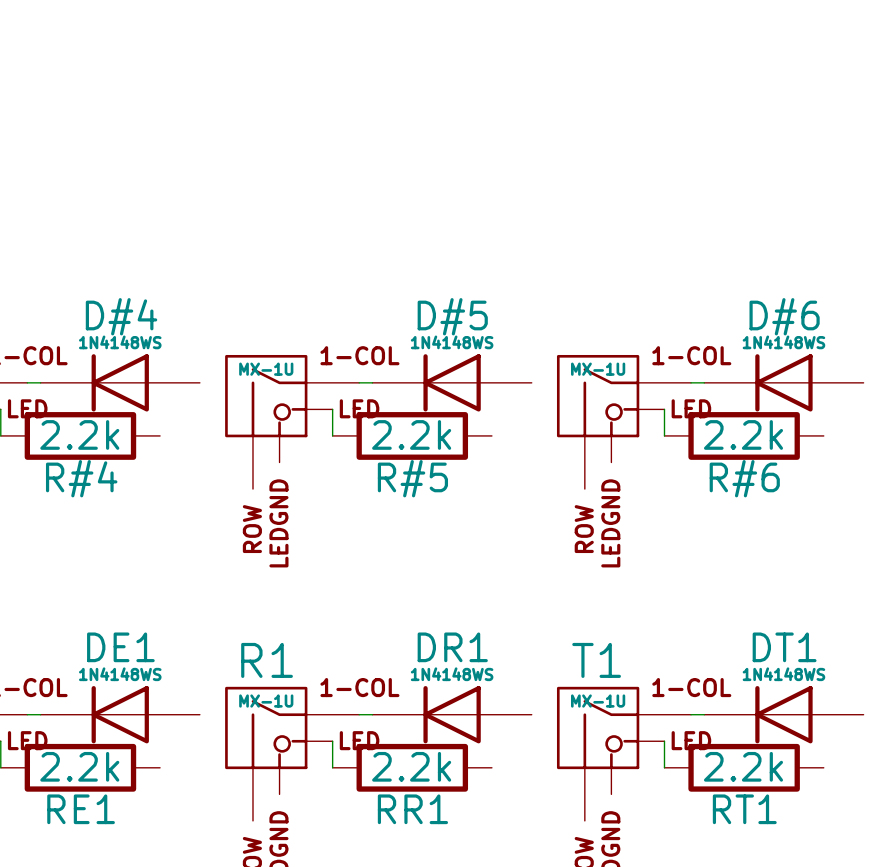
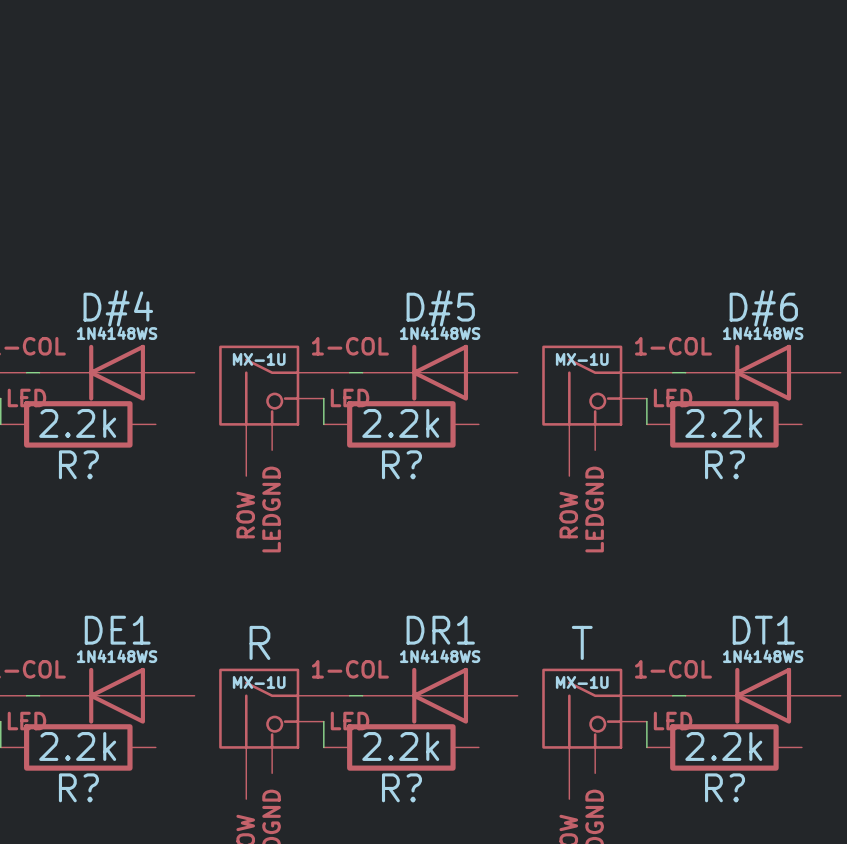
R#4 name: R#4 (81, 478) -> R? (78, 464)
R#5 name: R#5 (412, 478) -> R? (401, 464)
R#6 name: R#6 (744, 478) -> R? (725, 464)
R1 name: R1 (267, 660) -> R (259, 642)
T1 name: T1 (596, 660) -> T (582, 642)
RE1 name: RE1 (81, 809) -> R? (78, 787)
RR1 name: RR1 (412, 809) -> R? (401, 787)
RT1 name: RT1 (744, 809) -> R? (725, 787)

